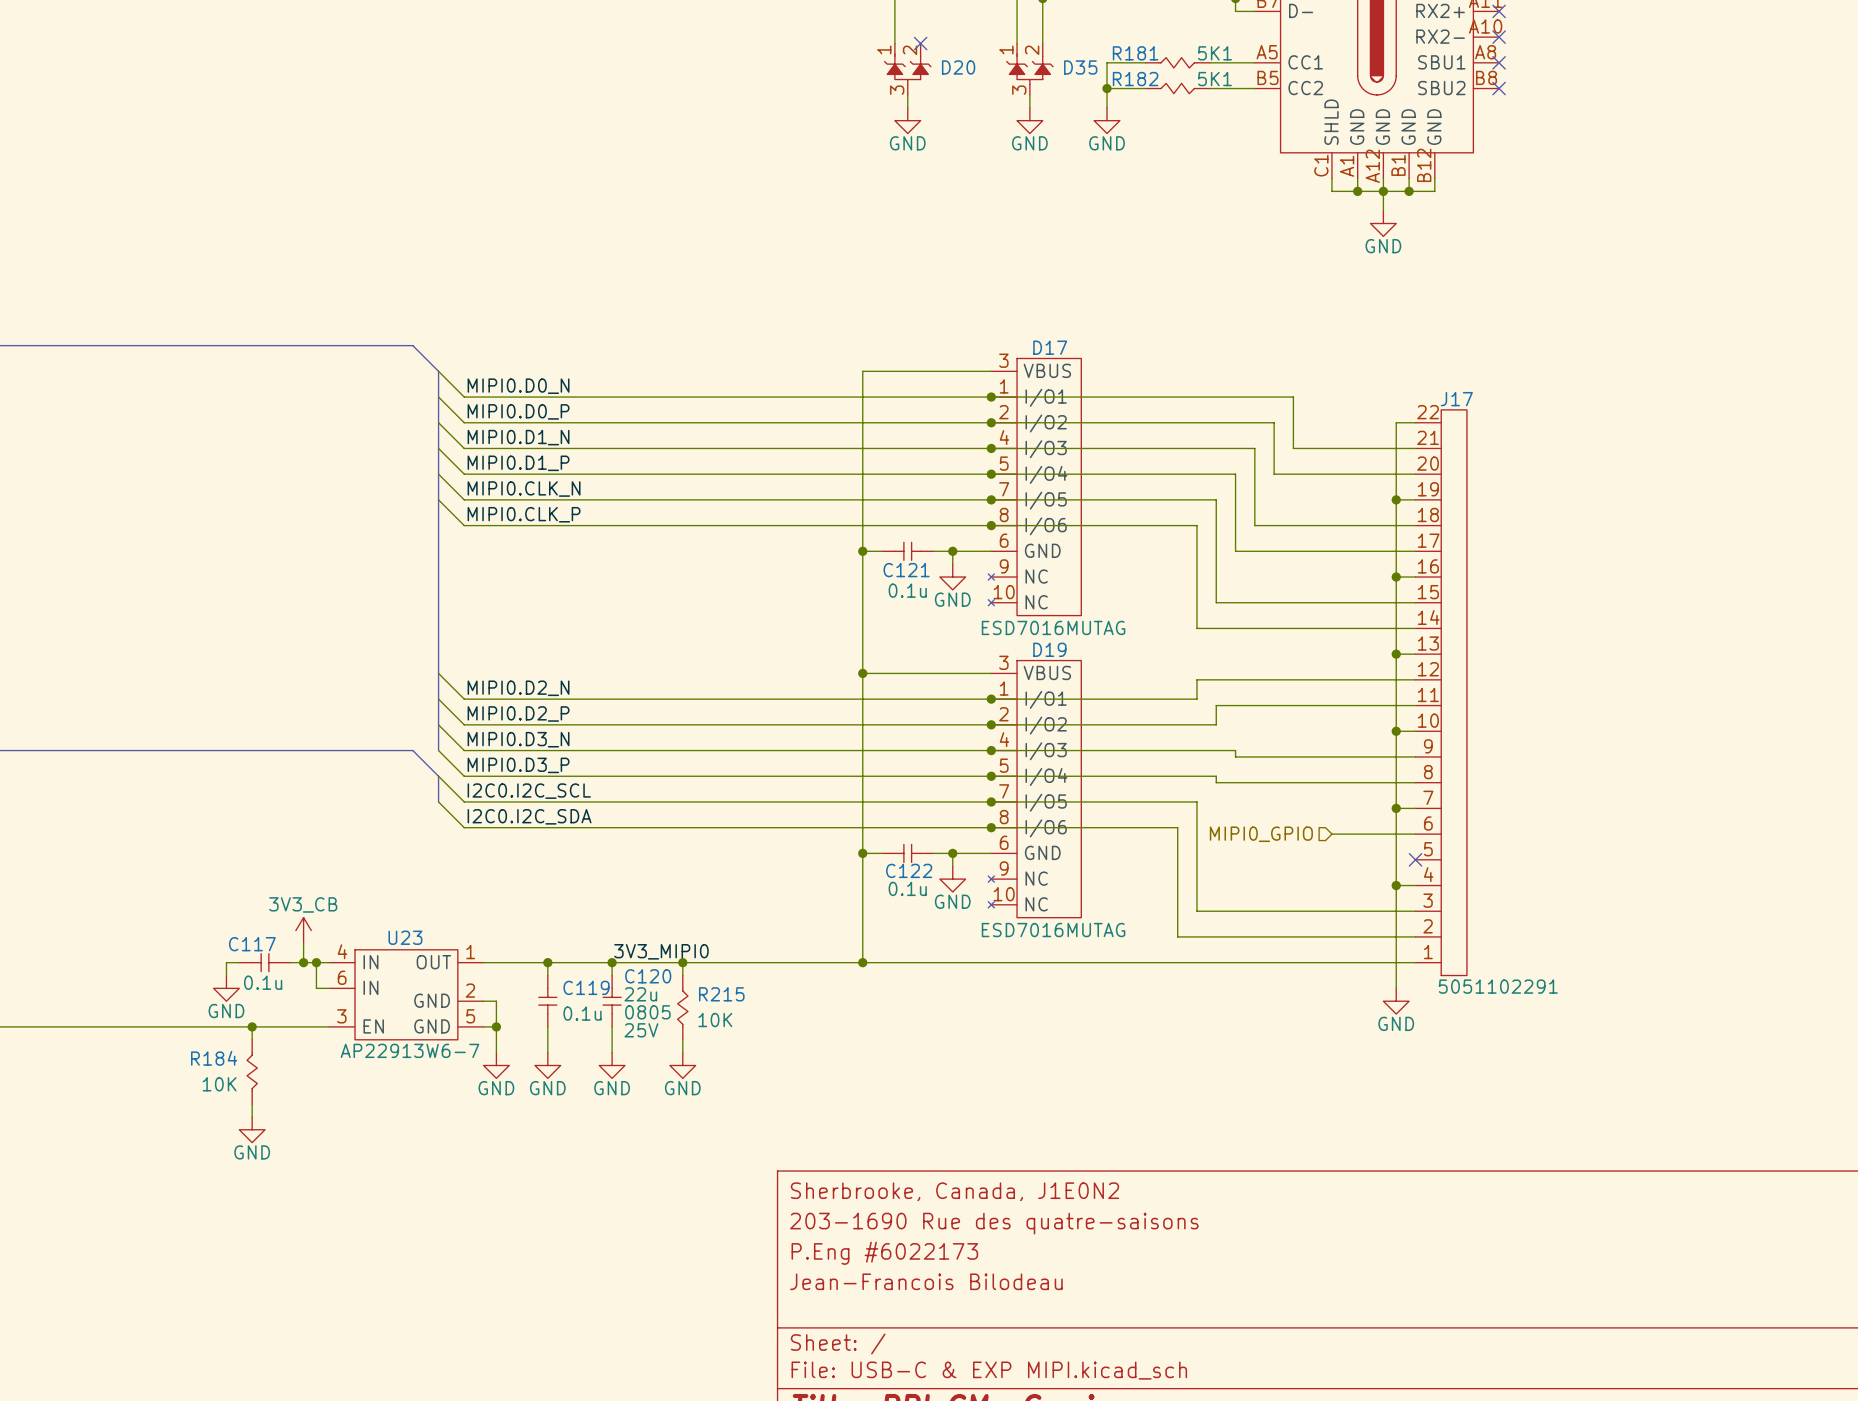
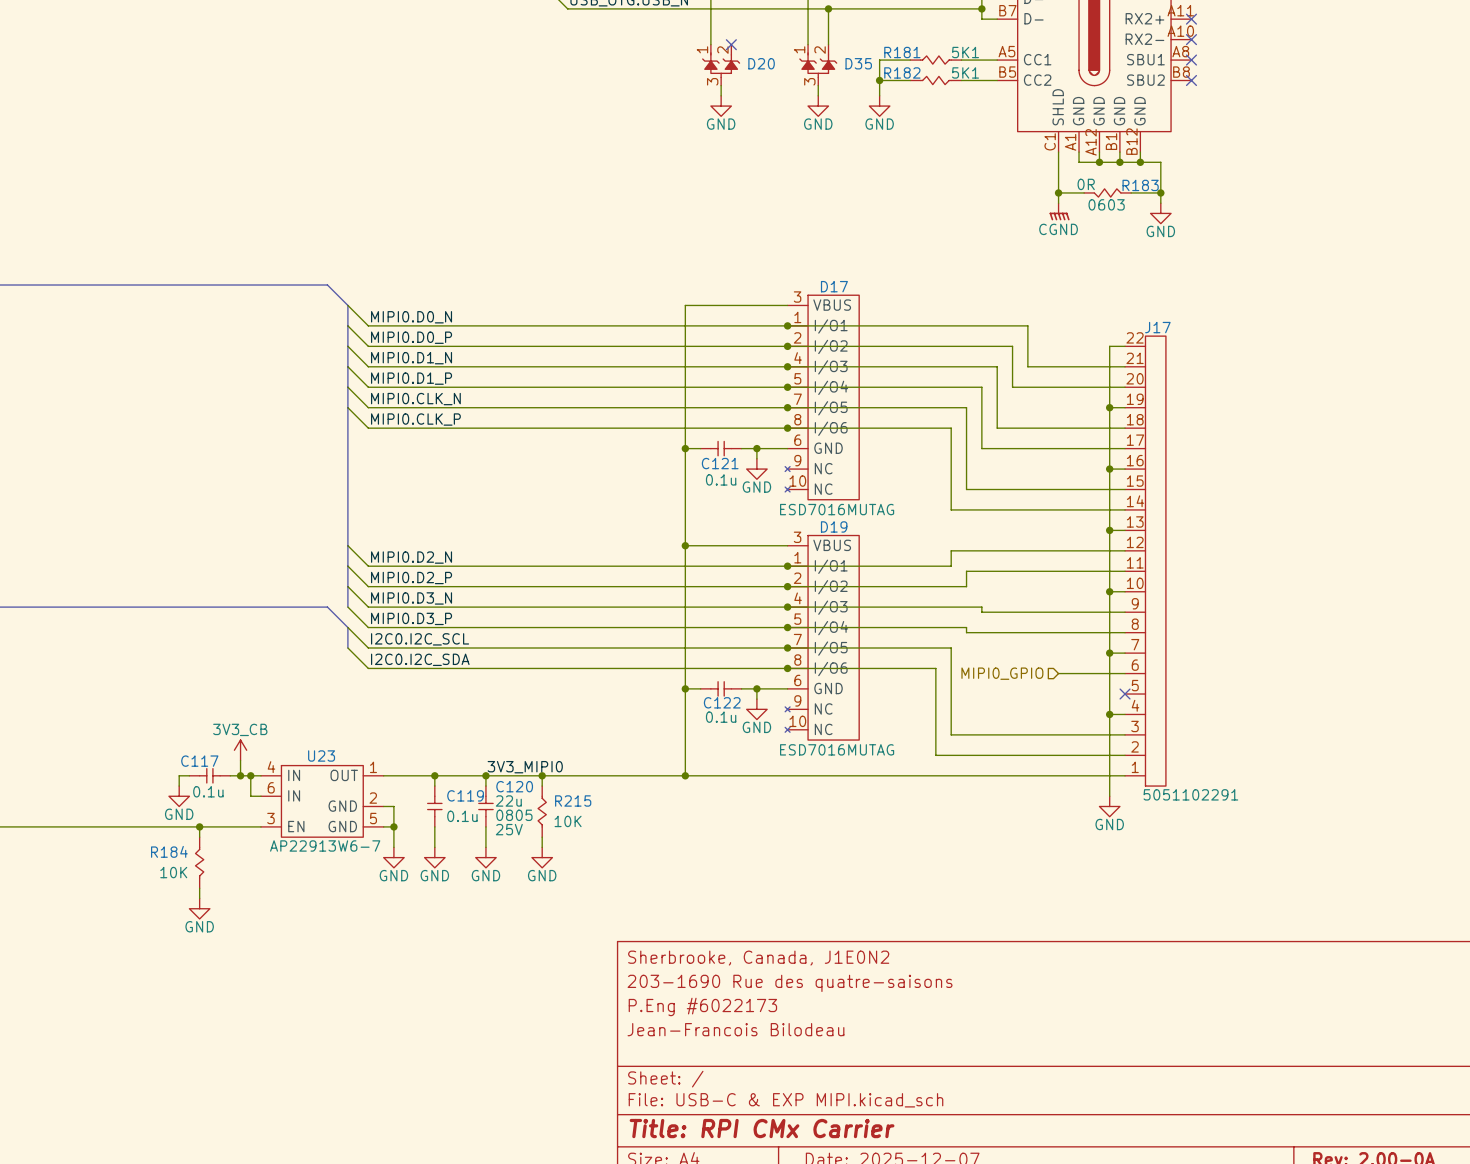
wire: (1331, 191) (1357, 191) -> (1058, 162) (1058, 203)
junction: (1357, 191) -> none
wire: (1383, 191) (1383, 210) -> none
wire: none -> (1140, 162) (1160, 162) (1160, 203)
junction: none -> (1140, 162)
power symbol position: GND (1383, 223) -> GND (1160, 213)
wire: none -> (1058, 192) (1084, 192)
junction: none -> (1058, 192)
R183: none -> 0R (1107, 192)
wire: none -> (1131, 192) (1160, 192)
junction: none -> (1160, 192)
power symbol: none -> CGND (1059, 211)

